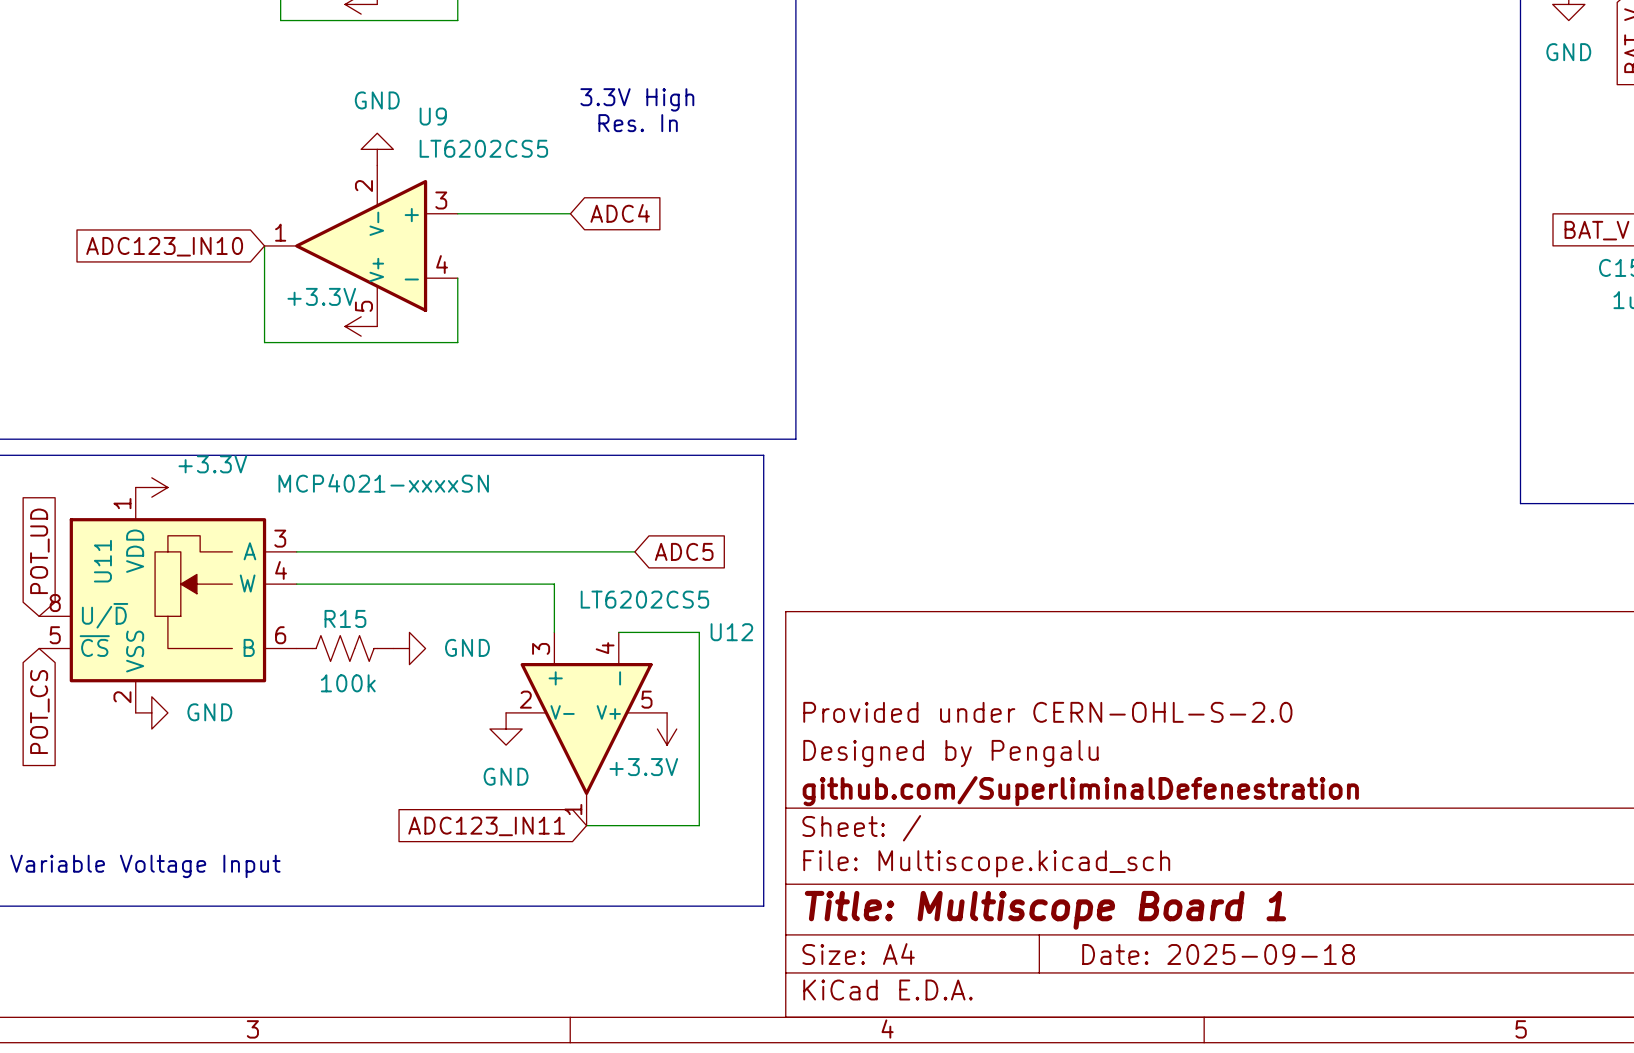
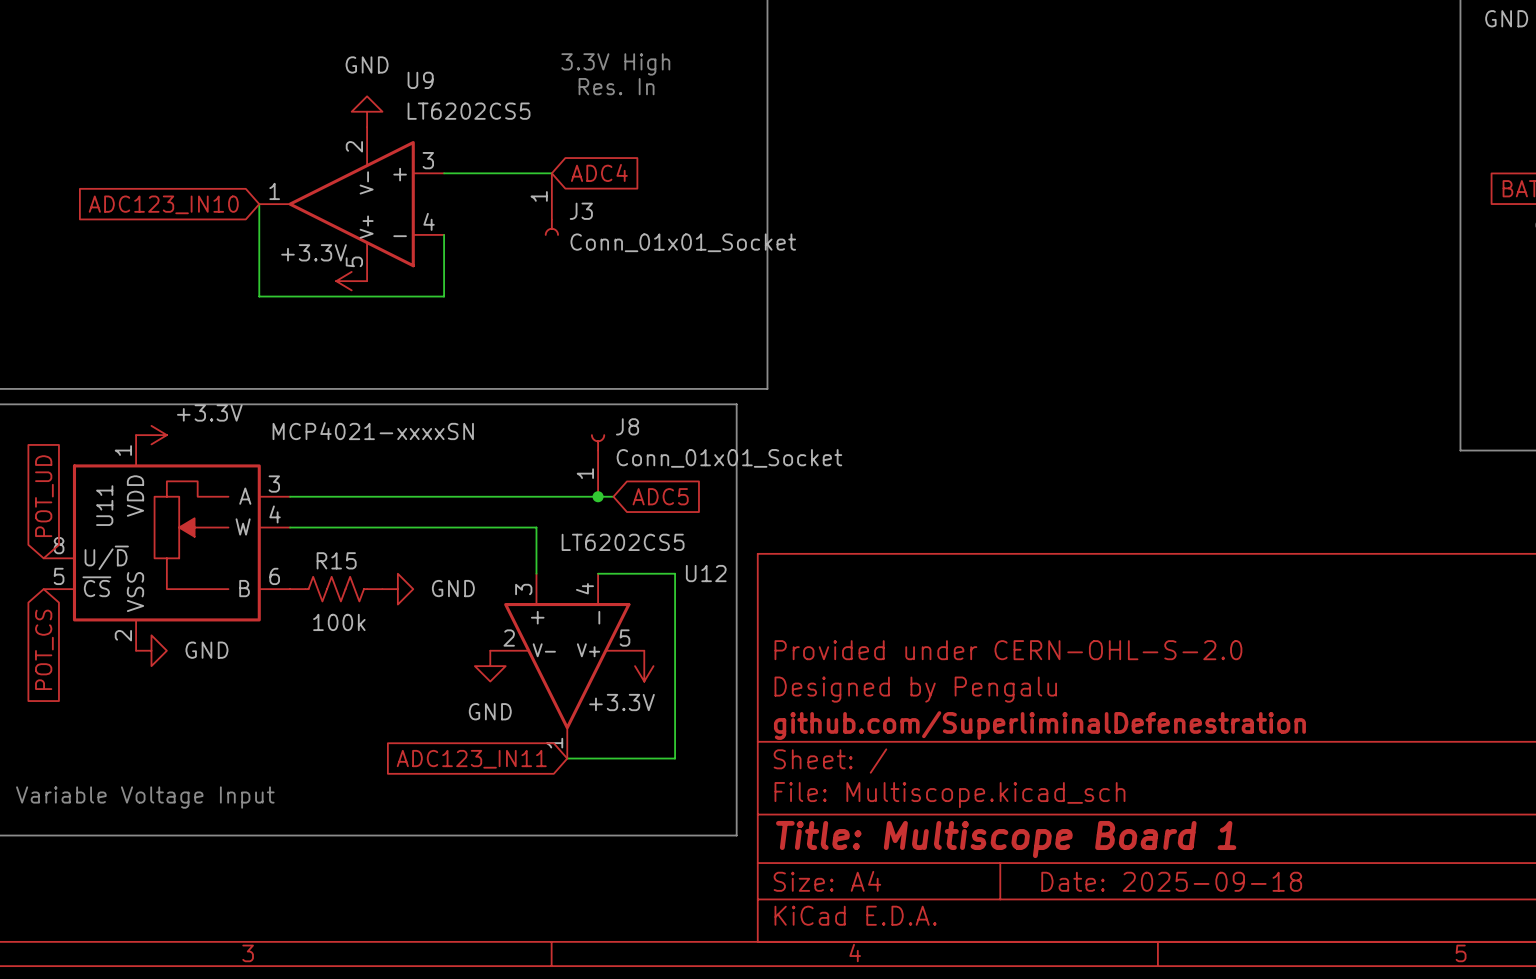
J3: none -> Conn_01x01_Socket (551, 204)
J8: none -> Conn_01x01_Socket (598, 465)
junction: none -> (598, 496)

